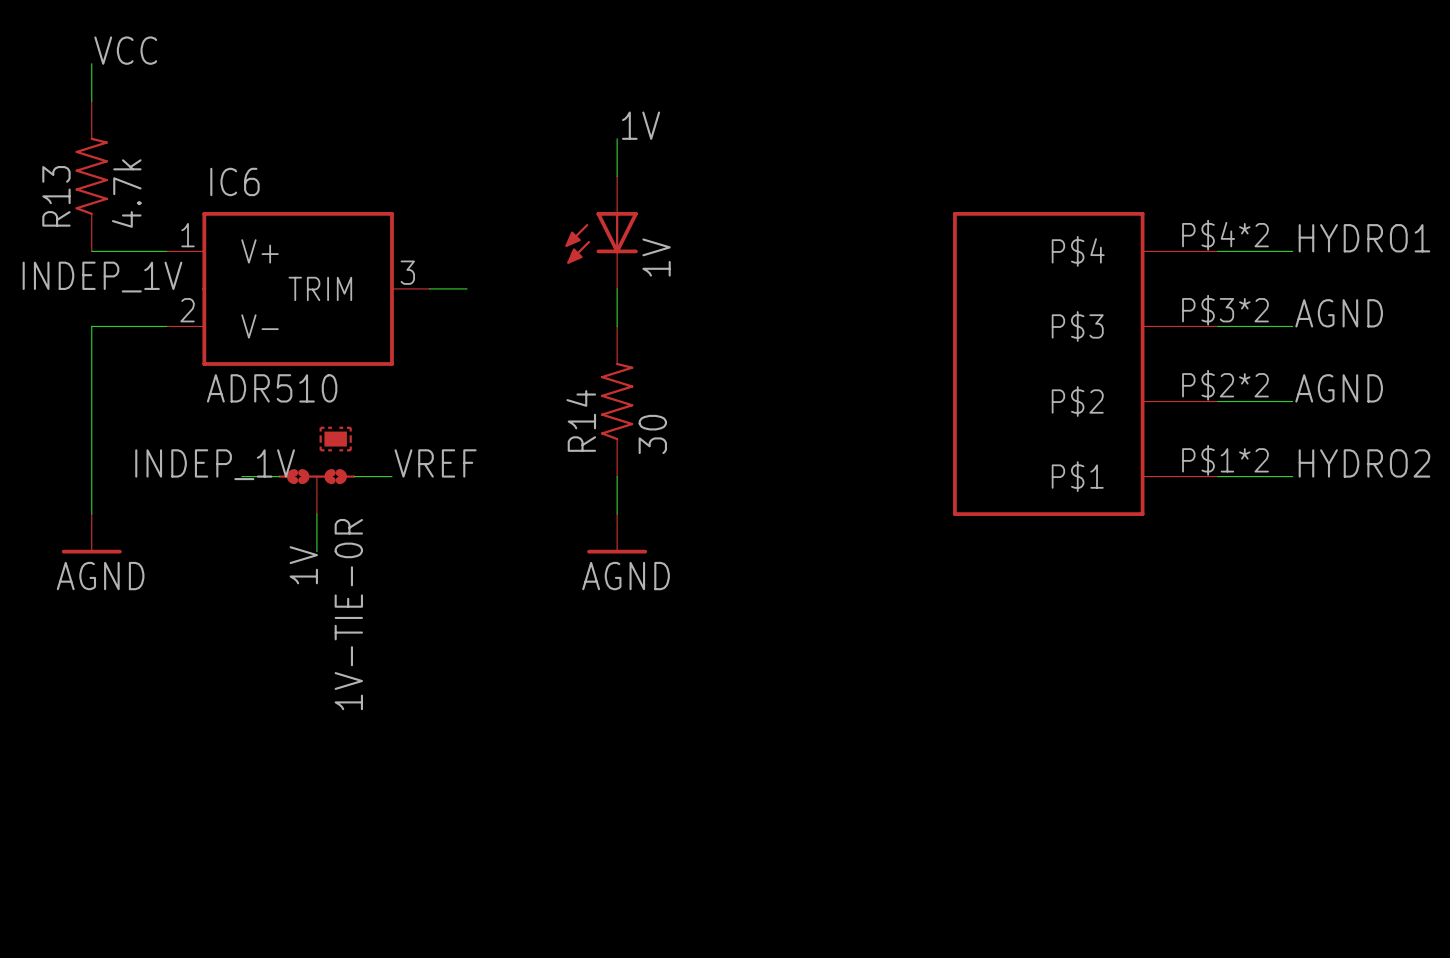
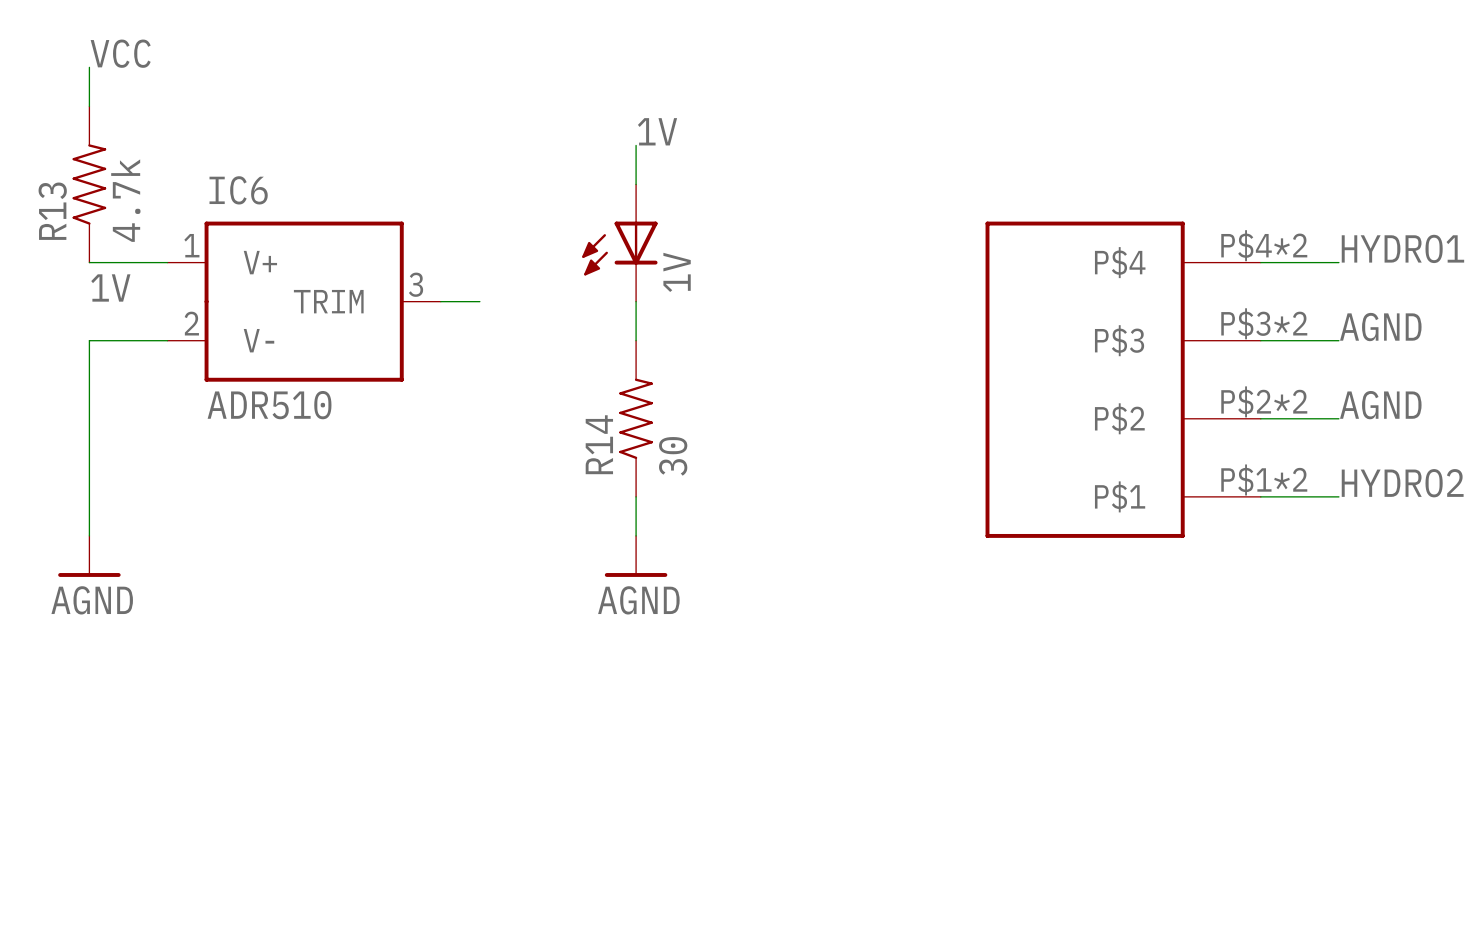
label: none -> 1V (110, 287)
label: INDEP_1V (102, 277) -> none
part: (335, 439) -> none
label: VREF (435, 463) -> none
label: INDEP_1V (215, 464) -> none
wire: (241, 476) (279, 476) -> none
wire: (354, 476) (391, 476) -> none
1V-TIE-0R: (316, 491) -> none
wire: (316, 514) (316, 551) -> none
label: 1V (303, 565) -> none

